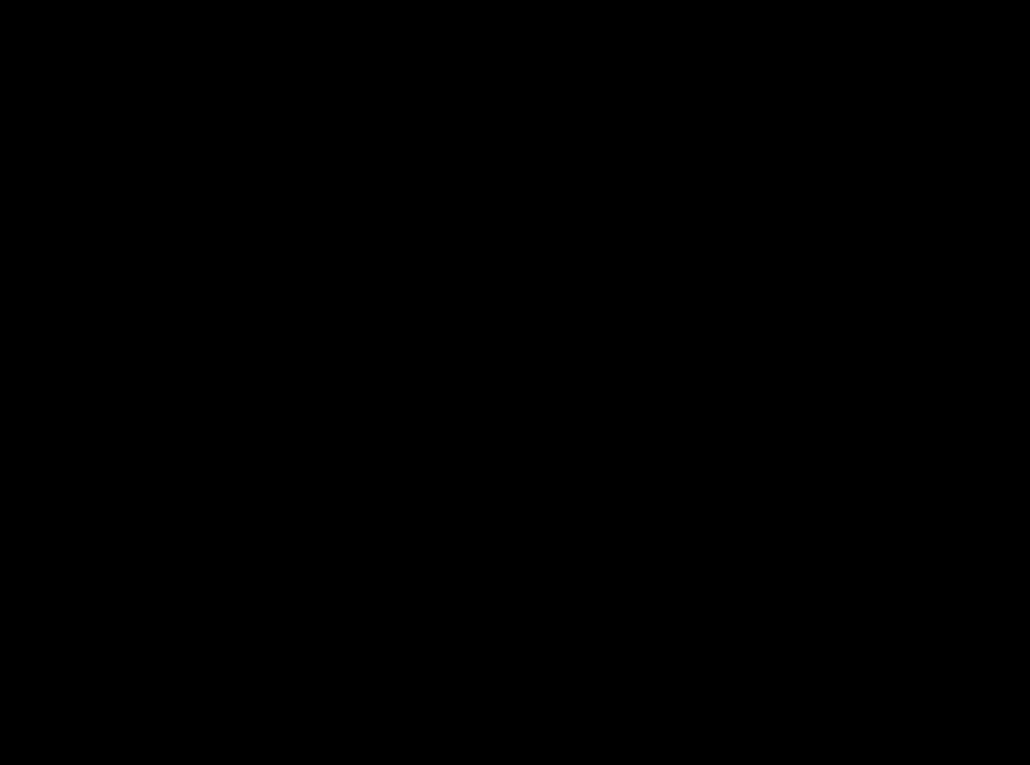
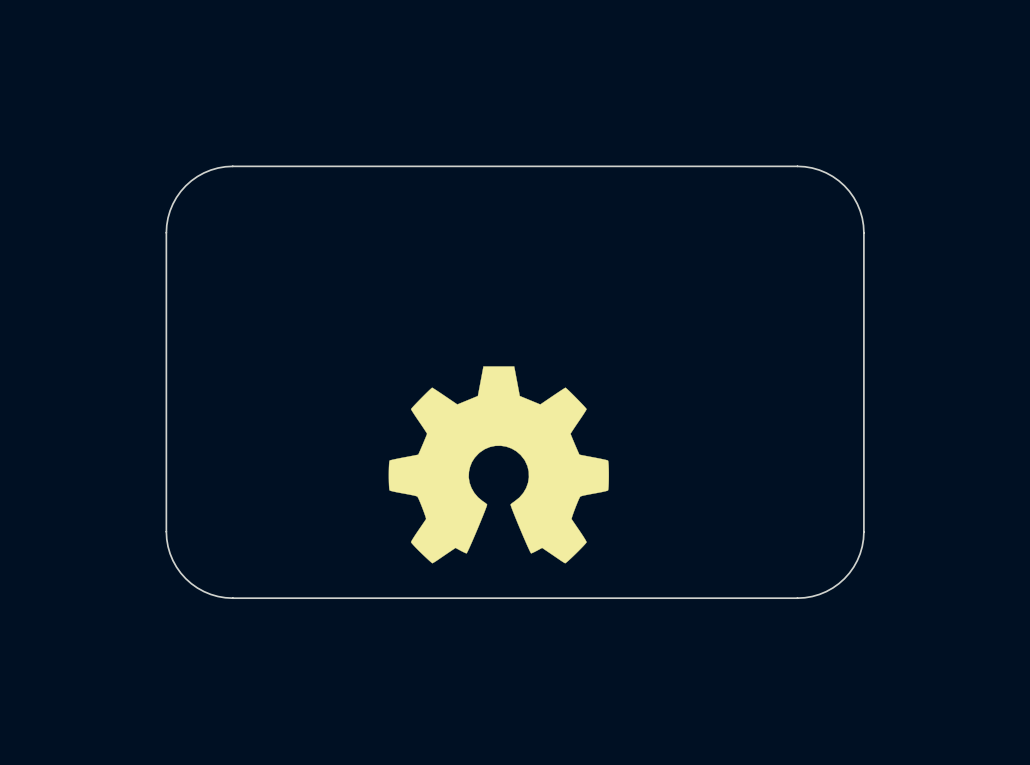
board edge: none -> (232, 166) (797, 166) (812, 168) (832, 176) (844, 185) (853, 197) (860, 210) (863, 232) (863, 531) (860, 553) (853, 567) (844, 578) (826, 591) (812, 596) (797, 598) (232, 598) (210, 594) (197, 587) (185, 578) (176, 567) (170, 553) (166, 539) (166, 225) (172, 203) (185, 185) (203, 172) (218, 168) (232, 166)
drawing: none -> [388, 366, 609, 564]

